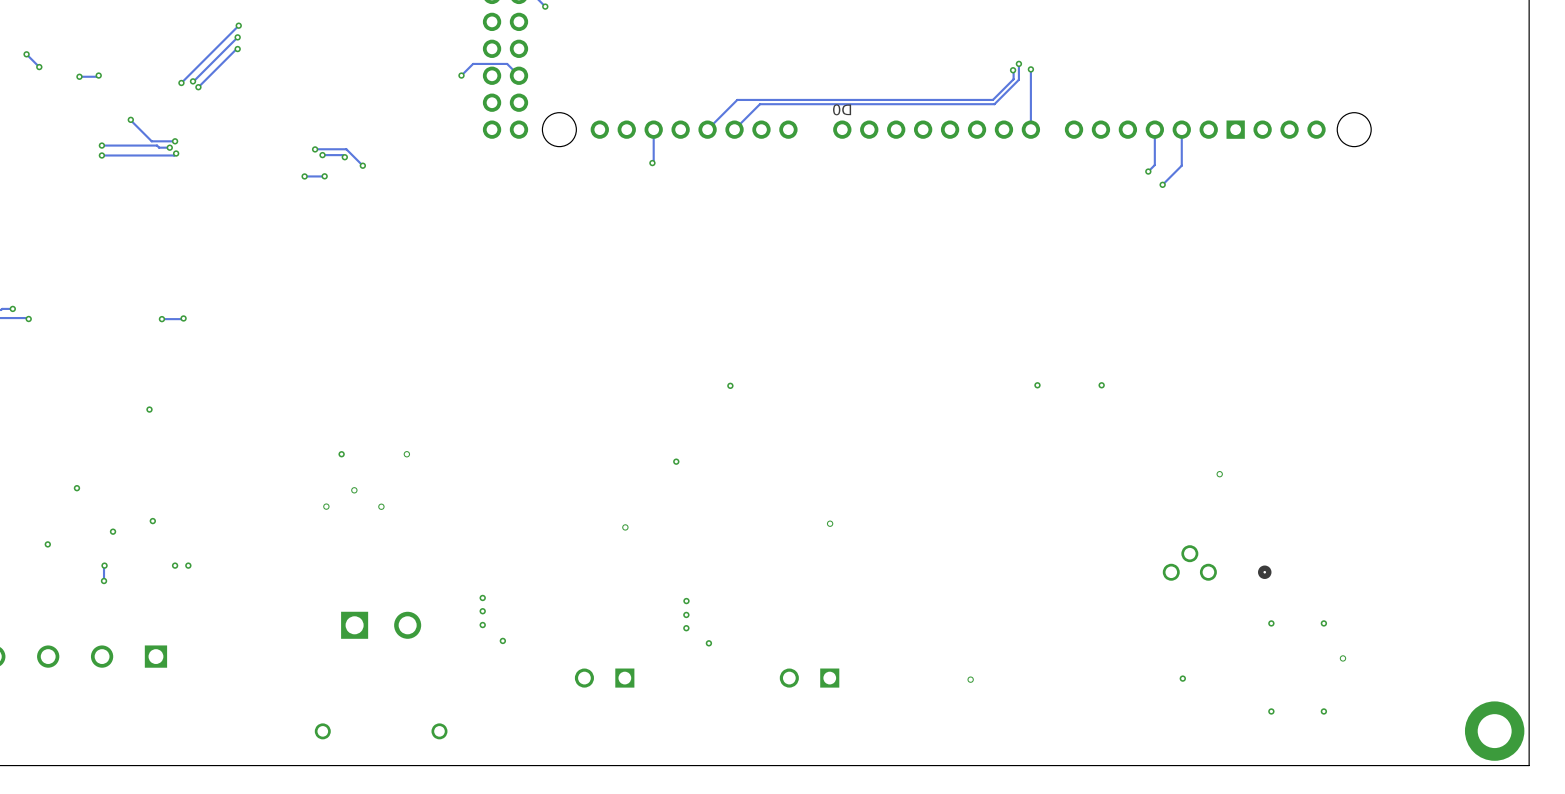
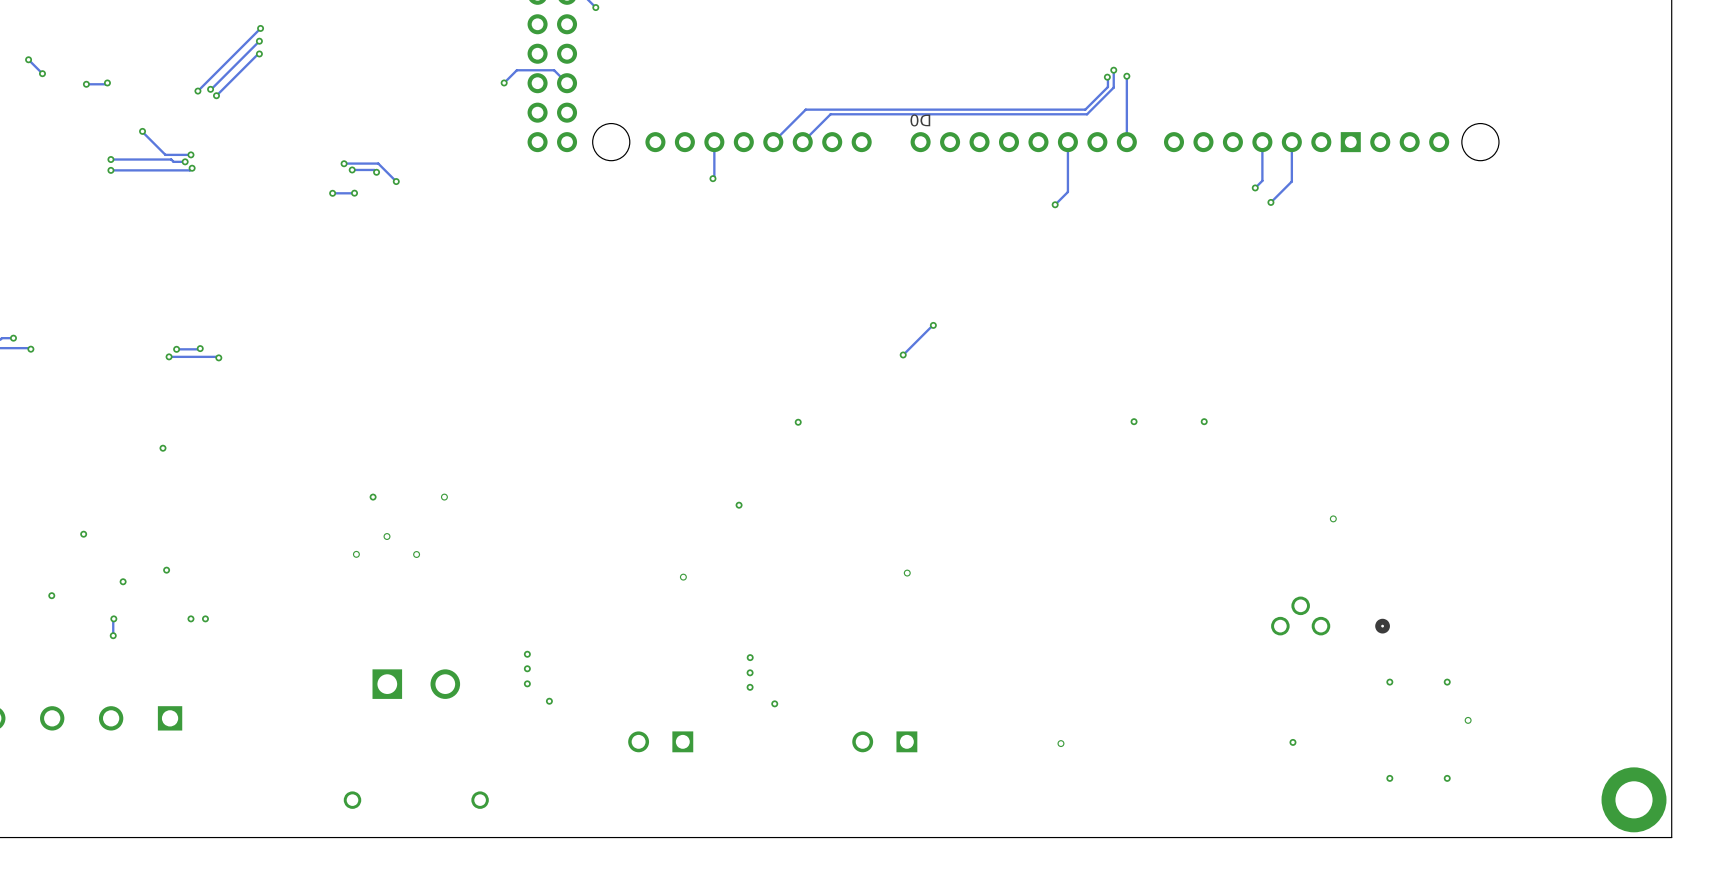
track: none -> (1067, 142) (1067, 192) (1055, 204)
via: none -> (1055, 204)
track: none -> (933, 325) (903, 354)
via: none -> (933, 325)
via: none -> (903, 354)
track: none -> (169, 356) (218, 357)
via: none -> (169, 356)
via: none -> (218, 357)

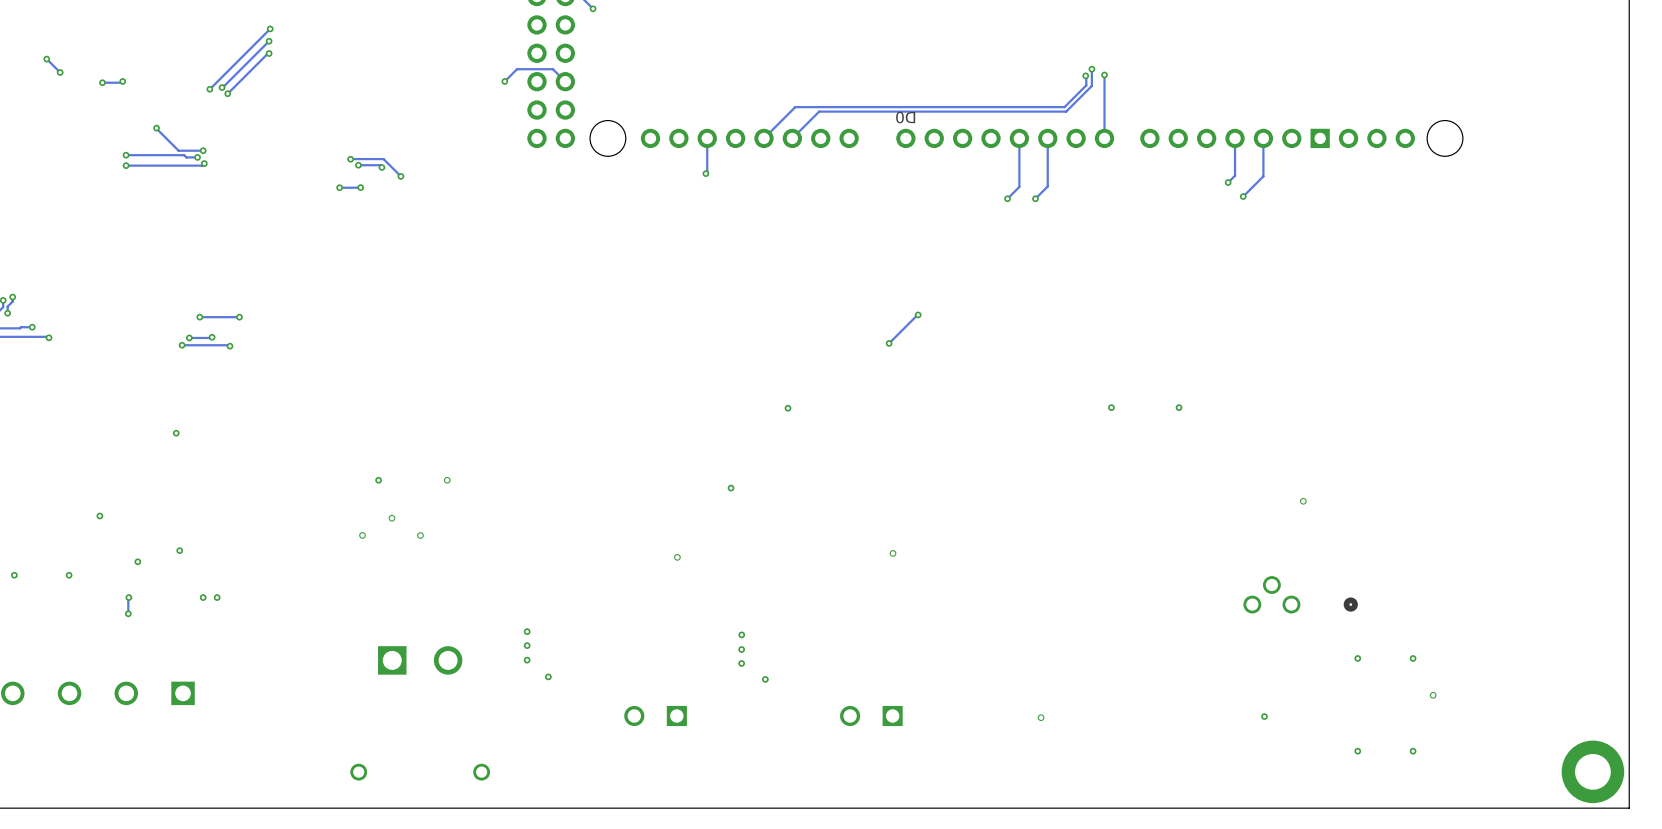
track: none -> (1019, 138) (1019, 186) (1007, 198)
via: none -> (1007, 198)
via: none -> (199, 317)
track: none -> (239, 317) (199, 317)
via: none -> (239, 317)

